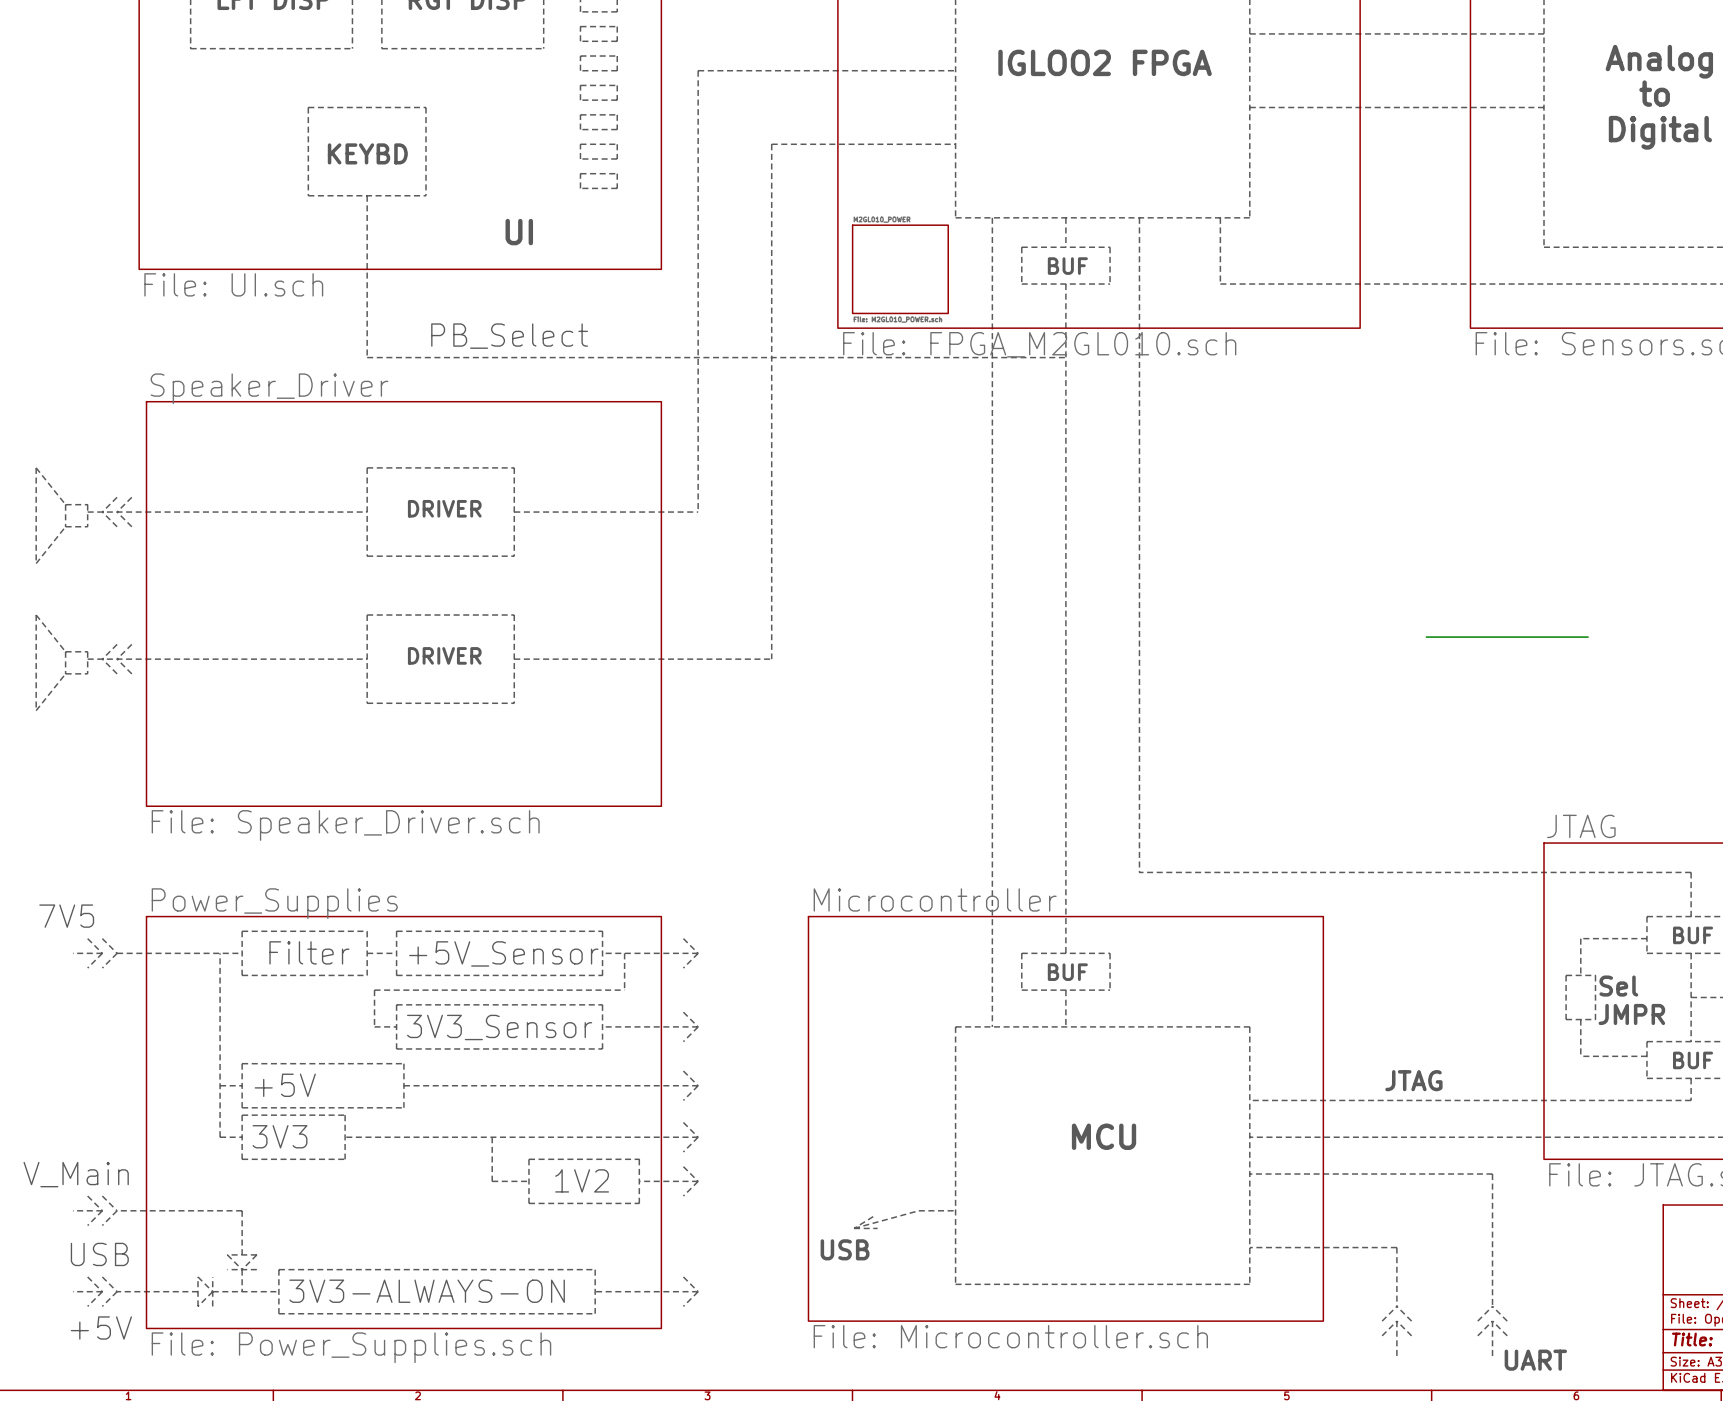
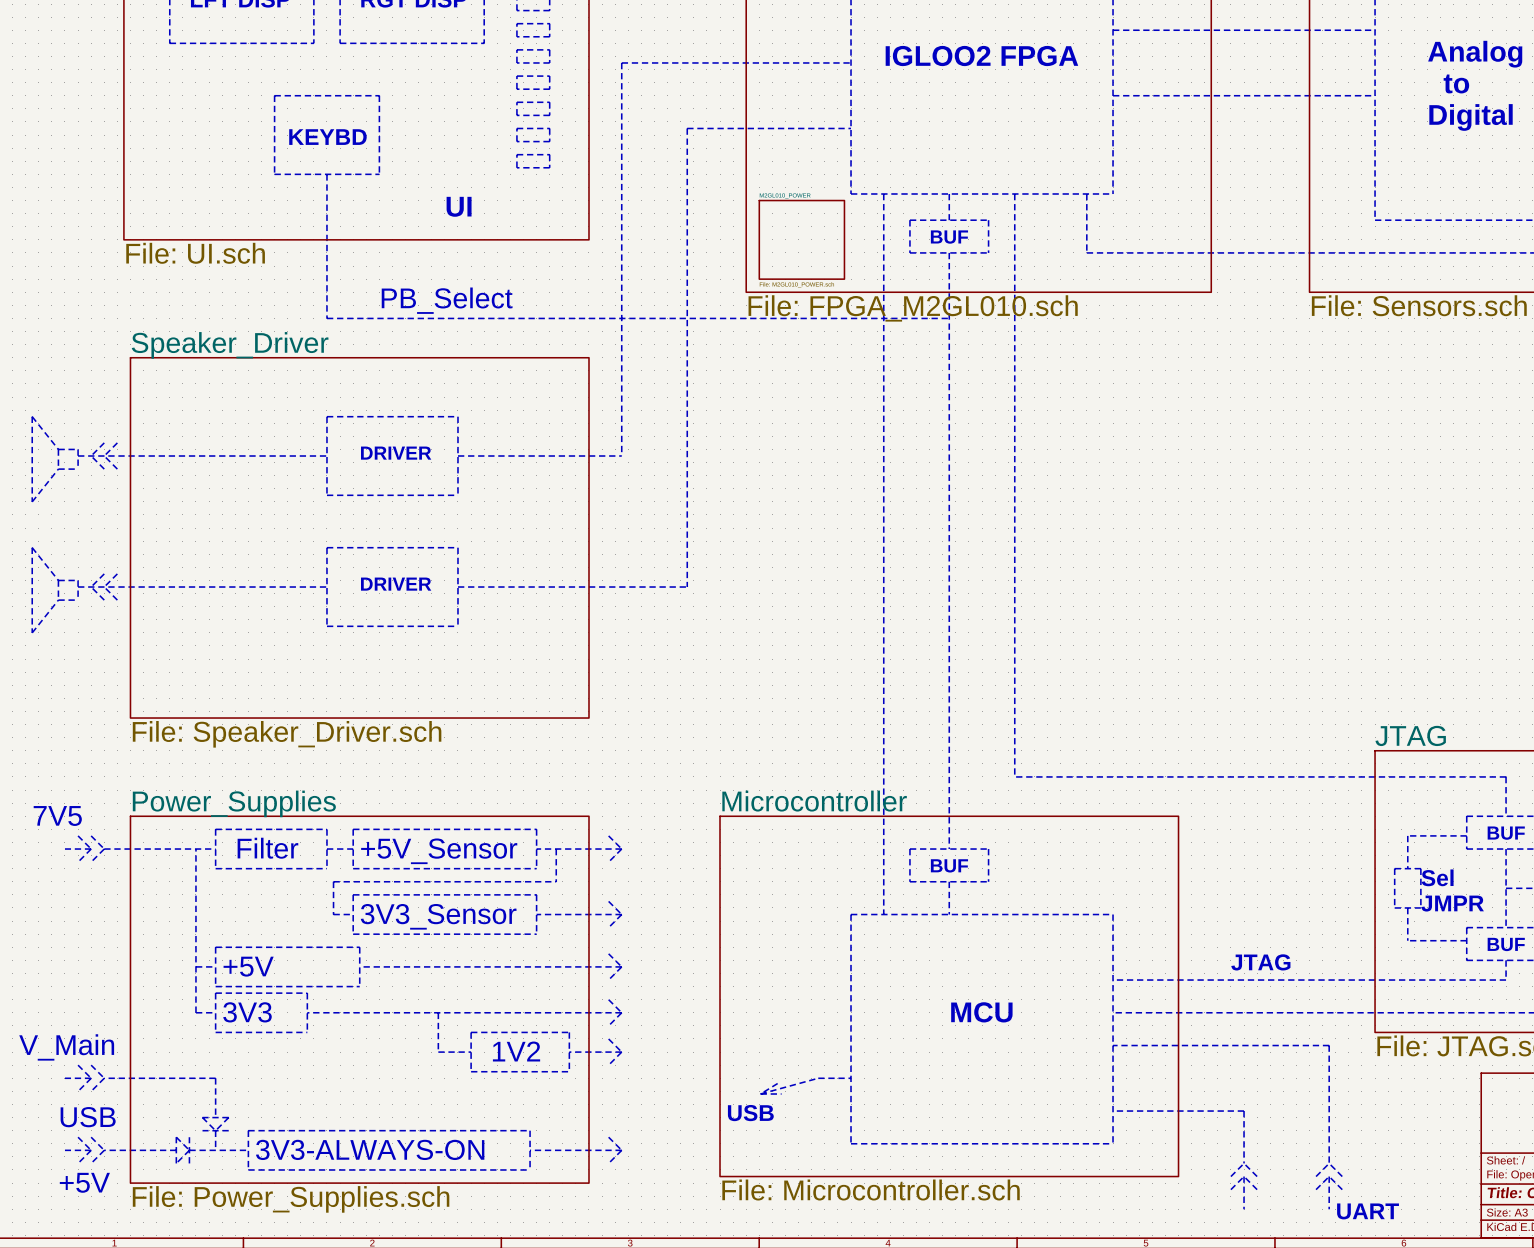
wire: (1426, 637) (1588, 637) -> none

